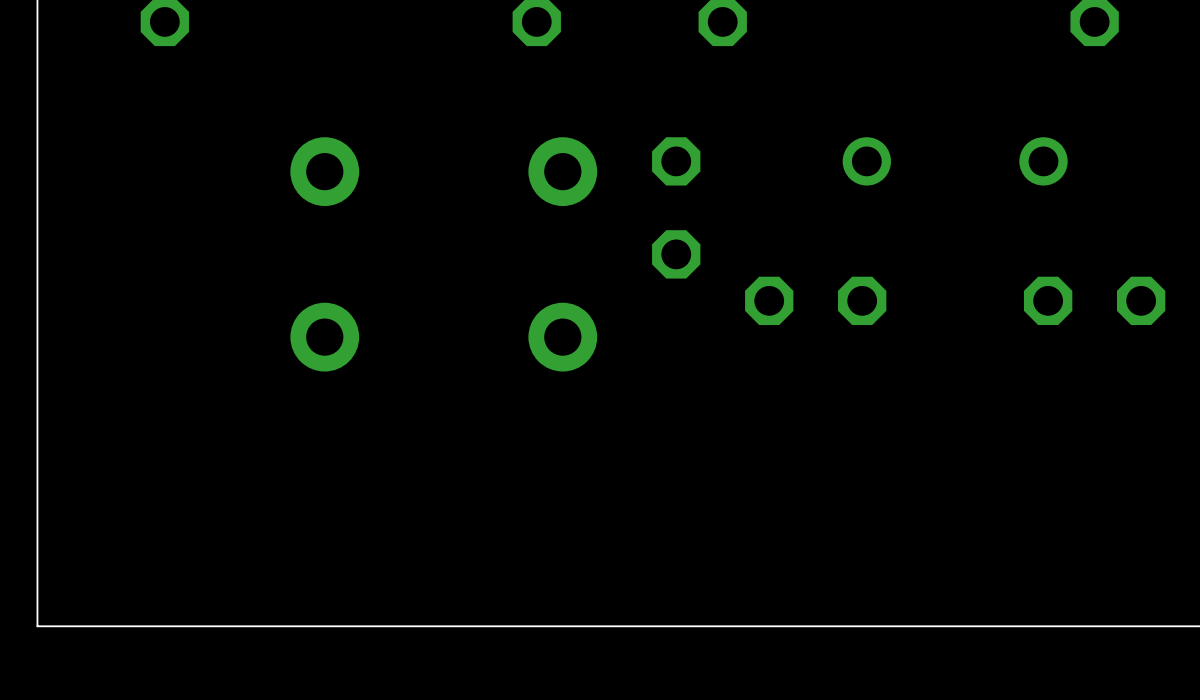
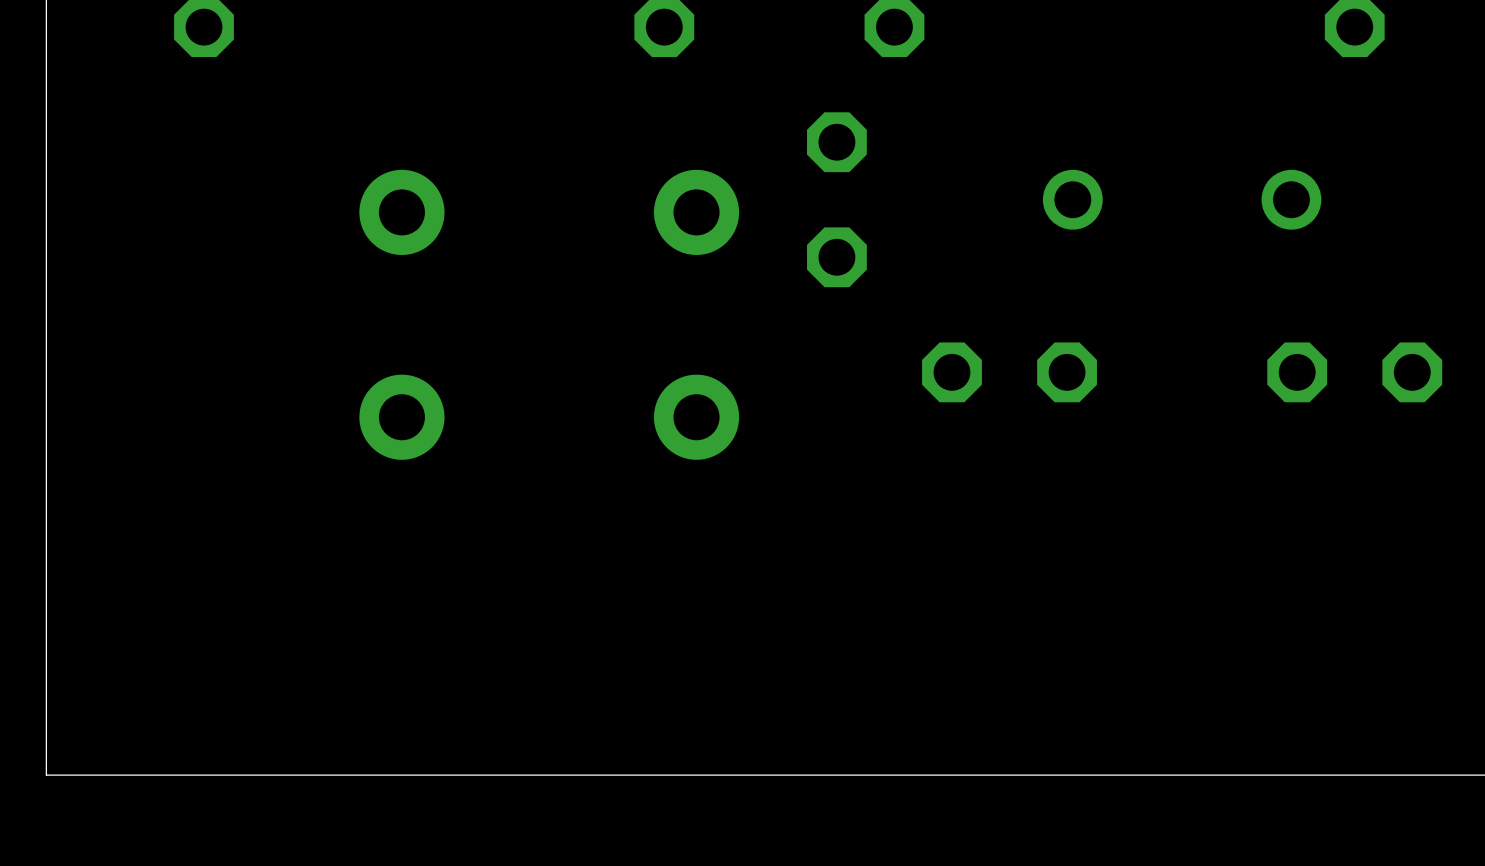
part position: (676, 207) -> (836, 199)

